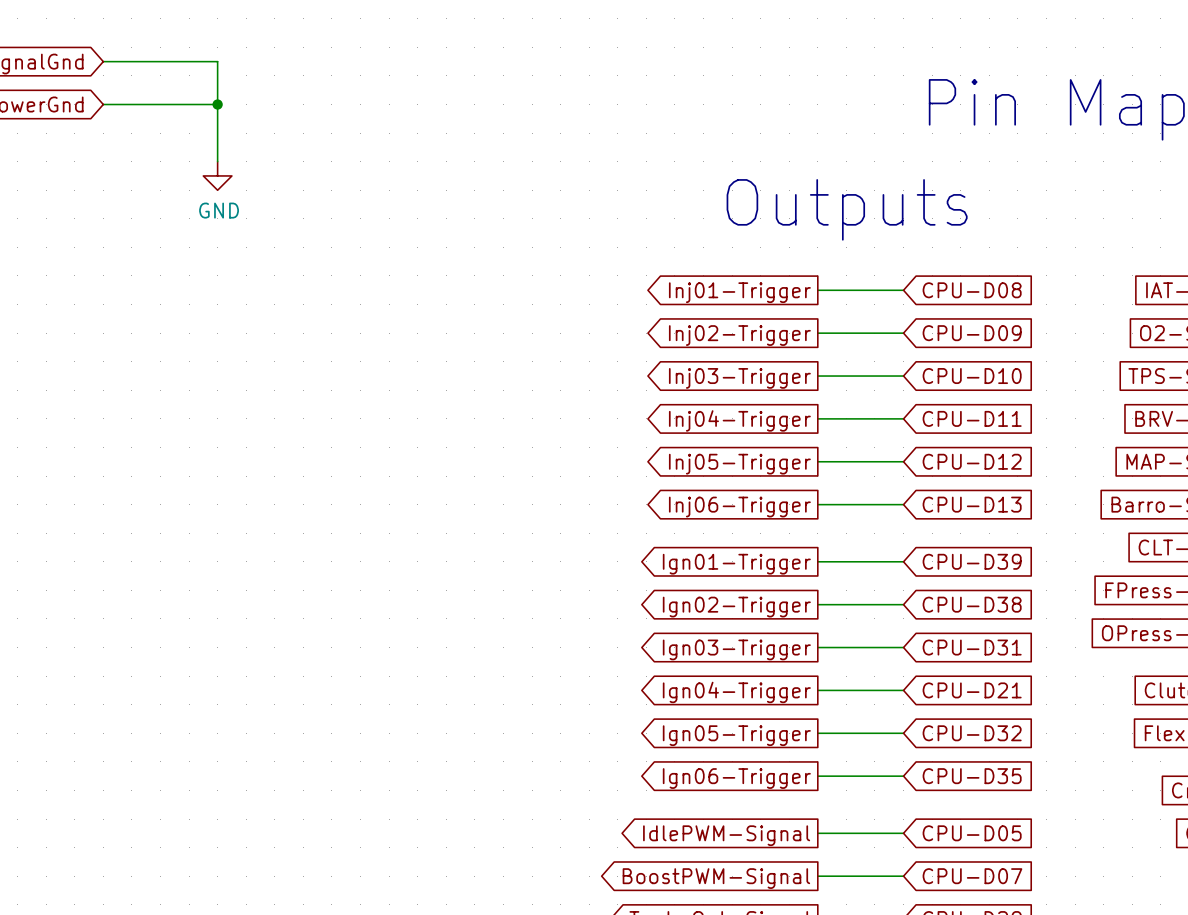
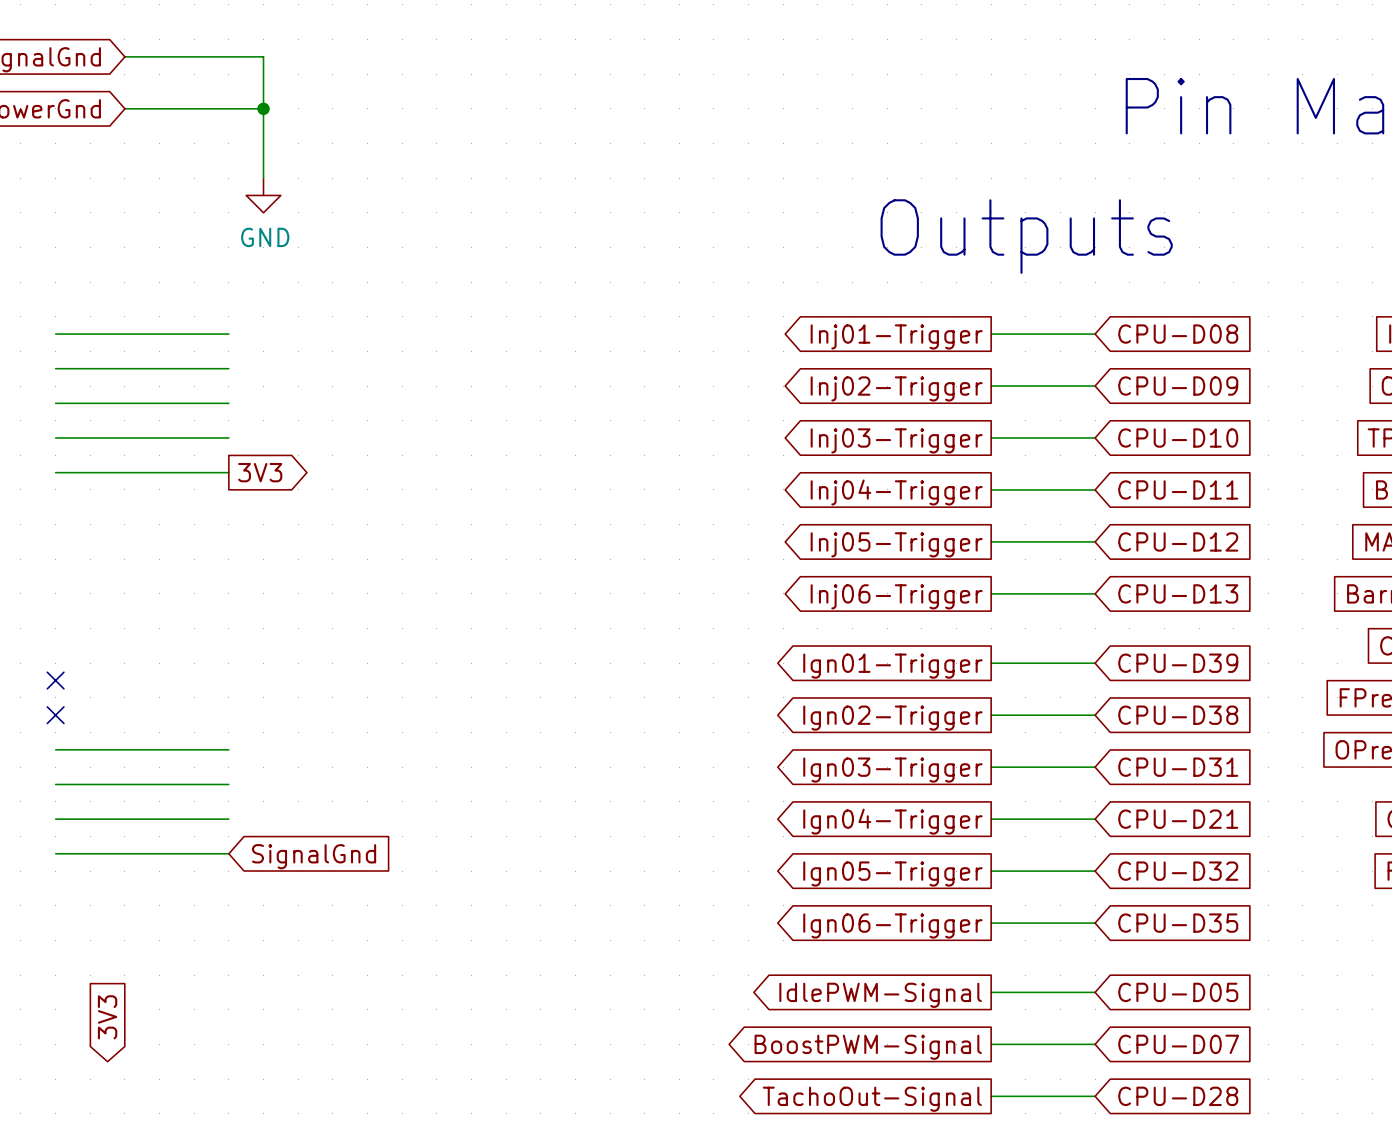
wire: none -> (55, 334) (228, 334)
wire: none -> (55, 368) (228, 368)
wire: none -> (55, 403) (228, 403)
wire: none -> (55, 438) (228, 438)
wire: none -> (55, 472) (228, 472)
global label: none -> 3V3 (260, 472)
no-connect mark: none -> (55, 680)
no-connect mark: none -> (55, 715)
wire: none -> (55, 749) (228, 749)
wire: none -> (55, 784) (228, 784)
wire: none -> (55, 819) (228, 819)
wire: none -> (55, 853) (228, 853)
global label: none -> SignalGnd (314, 856)
global label: none -> 3V3 (107, 1017)

